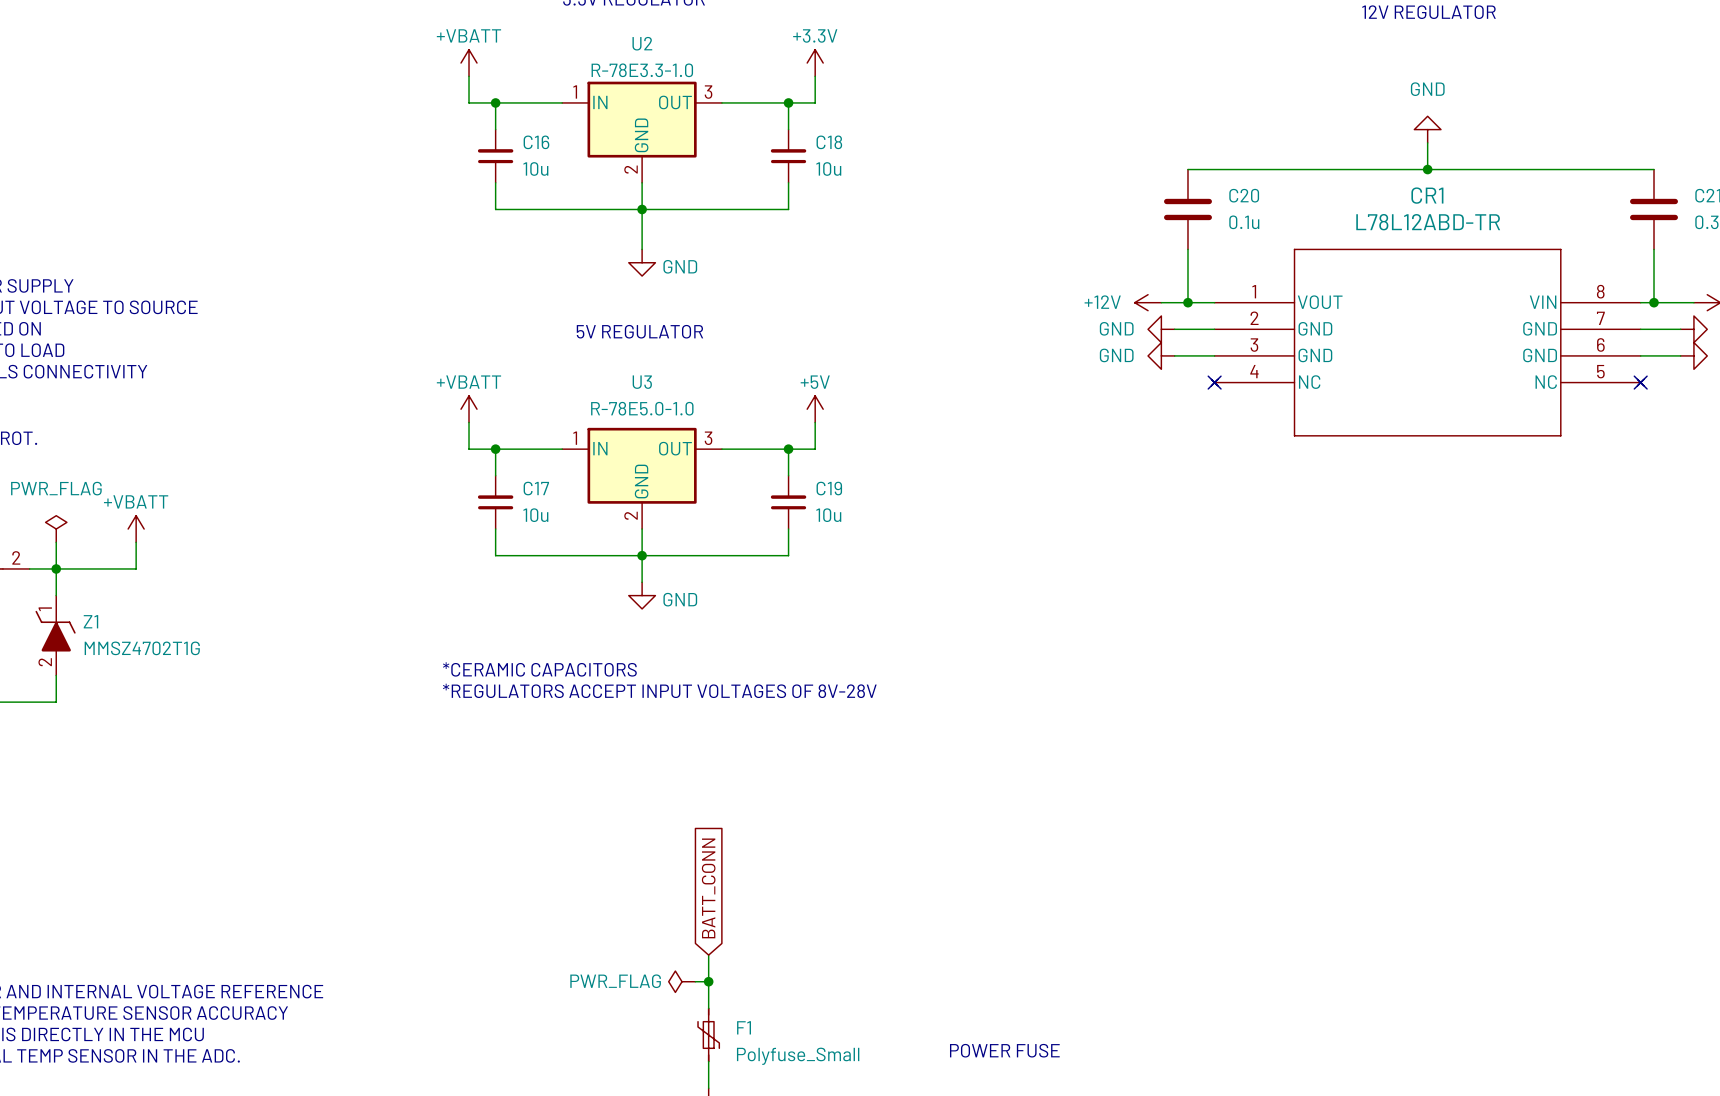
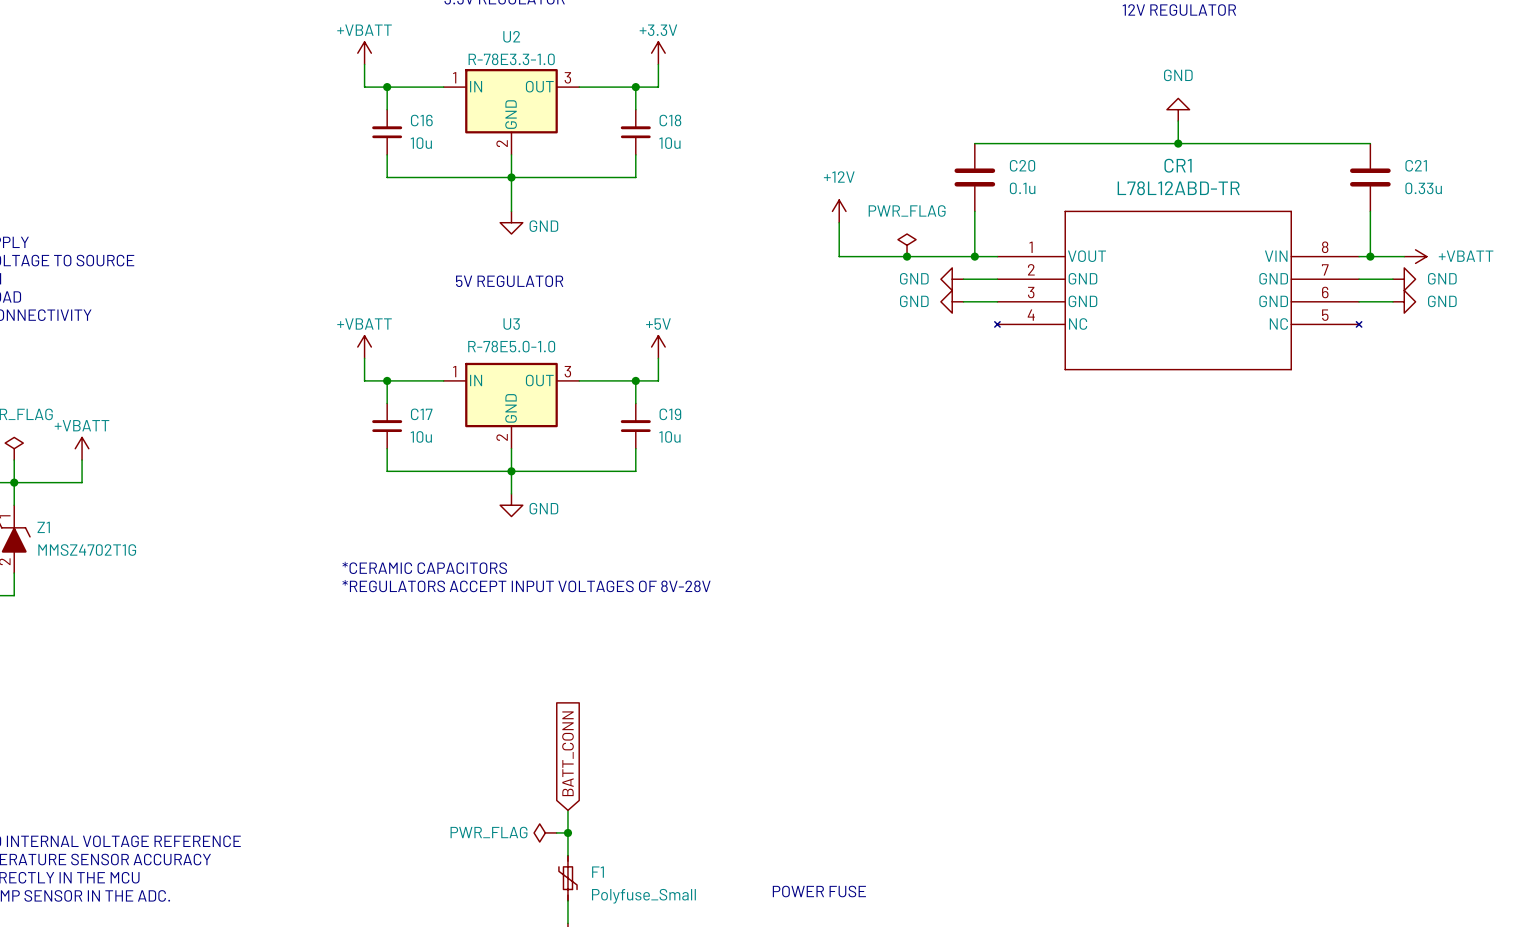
wire: none -> (839, 222) (839, 256) (952, 256)
power symbol: none -> PWR_FLAG (907, 245)
junction: none -> (907, 256)
power symbol rotation: 0° (1148, 302) -> 90° clockwise (839, 211)
power symbol position: +12V (1148, 302) -> +12V (839, 211)
no-connect mark: (1214, 382) -> none
no-connect mark: (1640, 382) -> none

